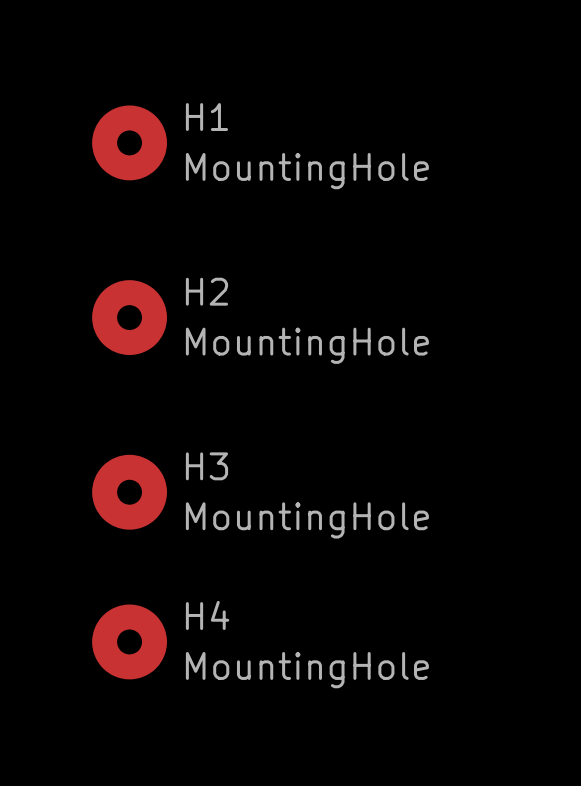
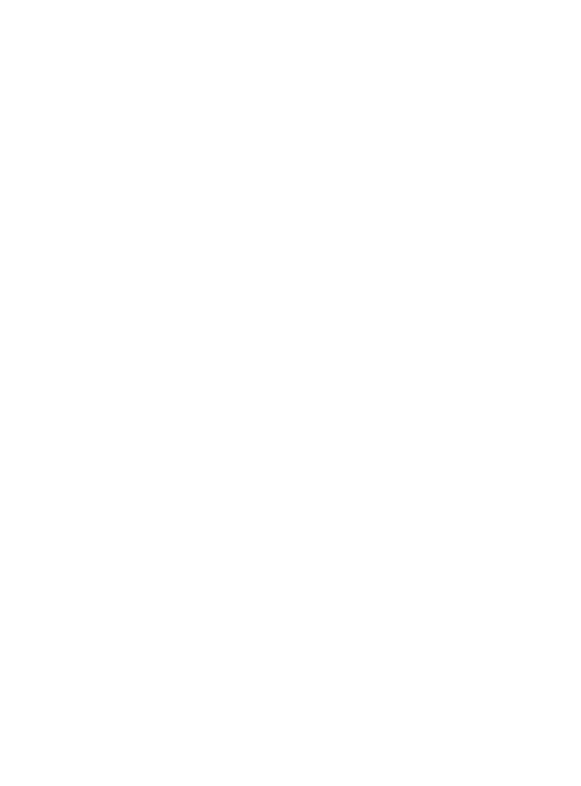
H1: MountingHole (129, 142) -> none
H2: MountingHole (129, 317) -> none
H3: MountingHole (129, 492) -> none
H4: MountingHole (129, 641) -> none

